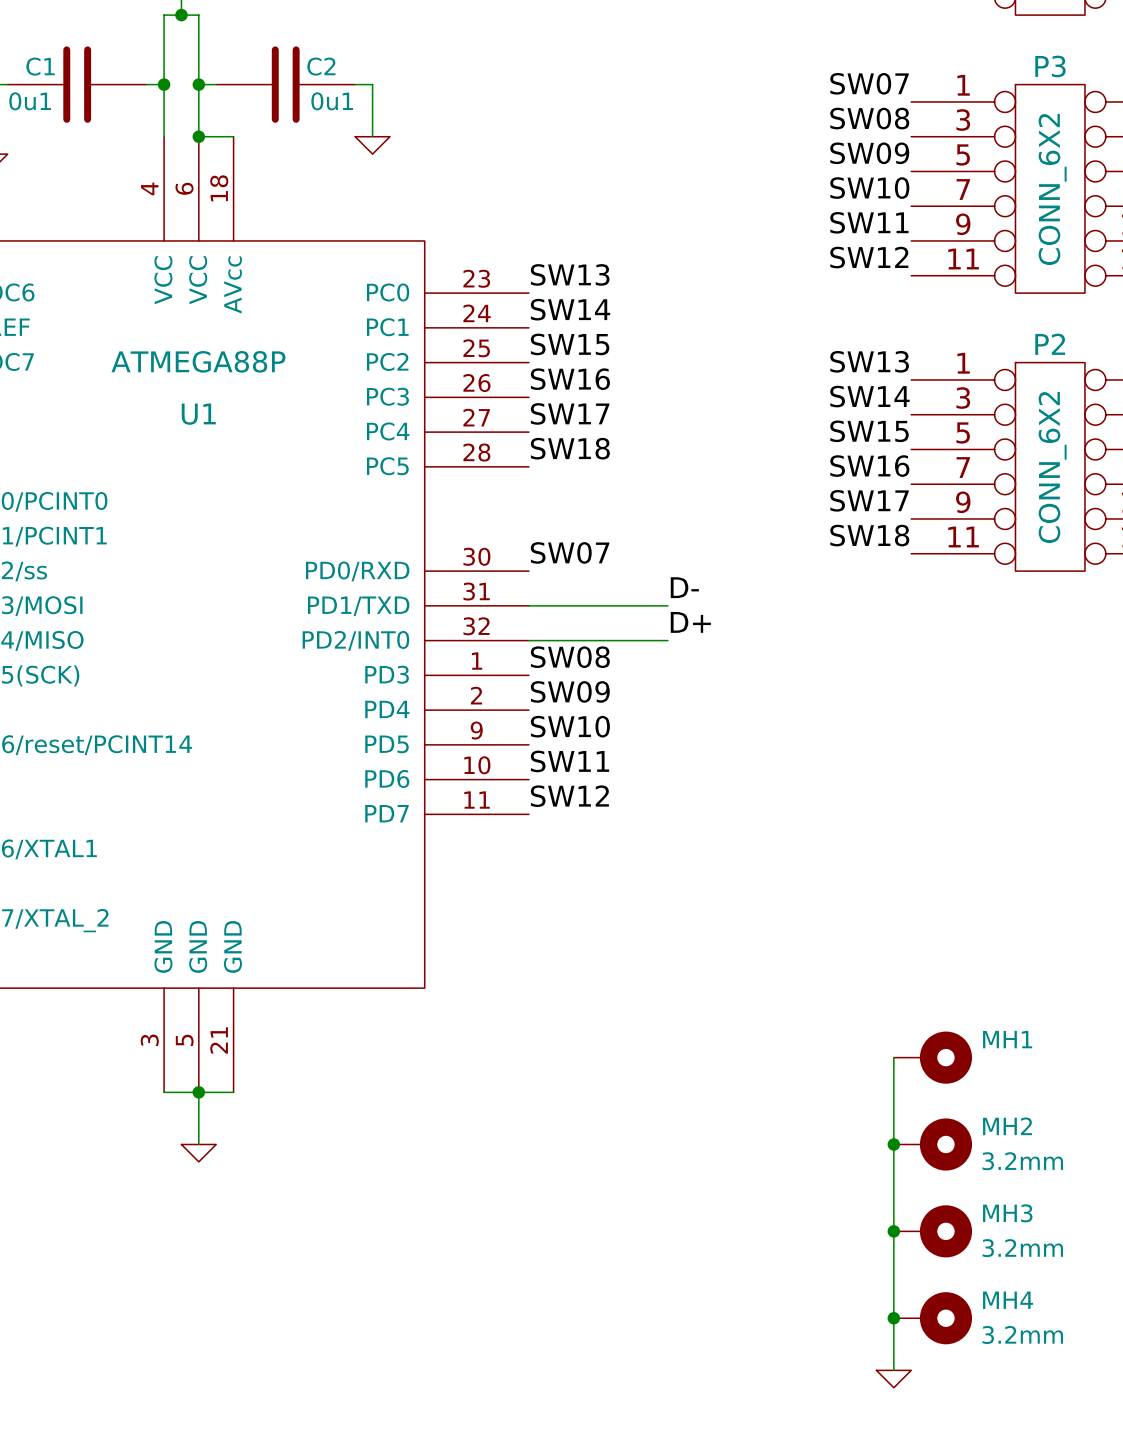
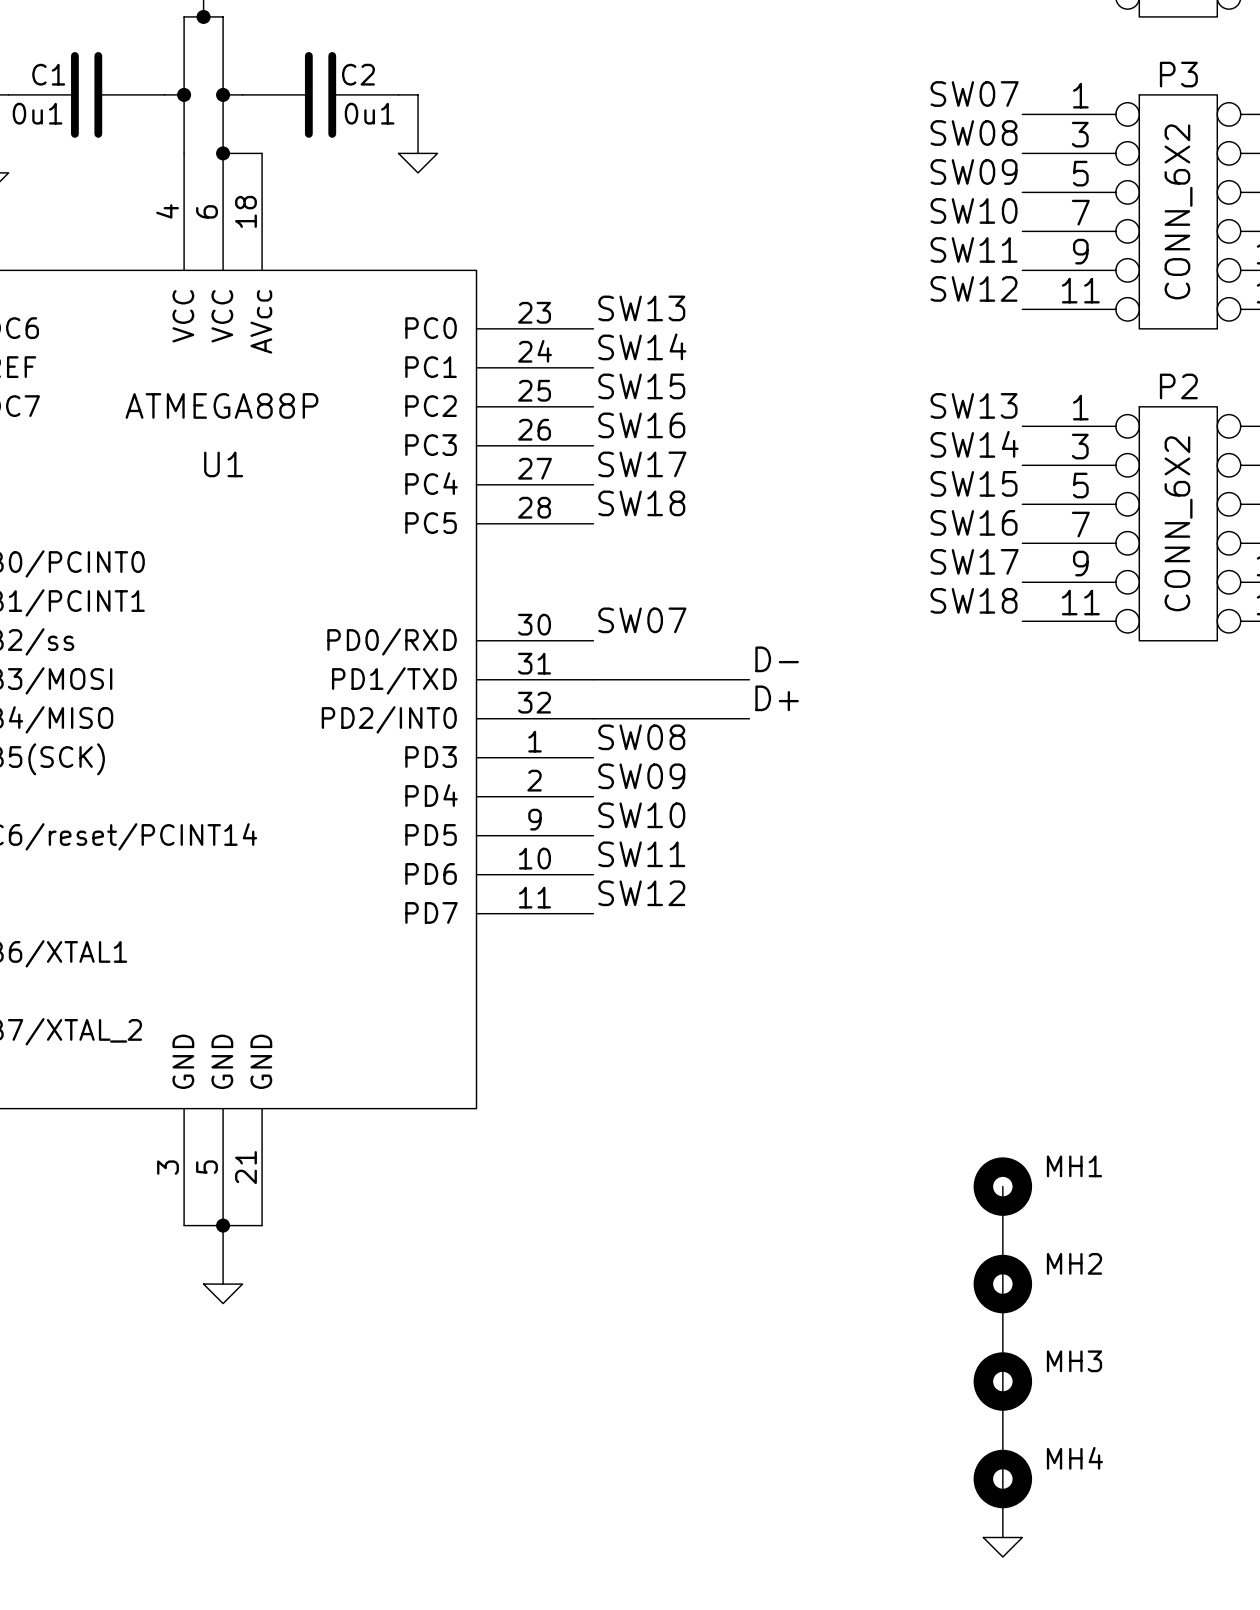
MH1 symbol: [893, 1031, 973, 1084] -> [973, 1157, 1033, 1216]
MH2 symbol: [893, 1118, 973, 1171] -> [973, 1254, 1033, 1314]
junction: (893, 1144) -> none
MH2 value: 3.2mm (1022, 1161) -> none
MH3 symbol: [893, 1205, 973, 1258] -> [973, 1352, 1033, 1411]
junction: (893, 1231) -> none
MH3 value: 3.2mm (1022, 1248) -> none
MH4 symbol: [893, 1292, 973, 1345] -> [973, 1449, 1033, 1509]
junction: (893, 1318) -> none
MH4 value: 3.2mm (1022, 1334) -> none

